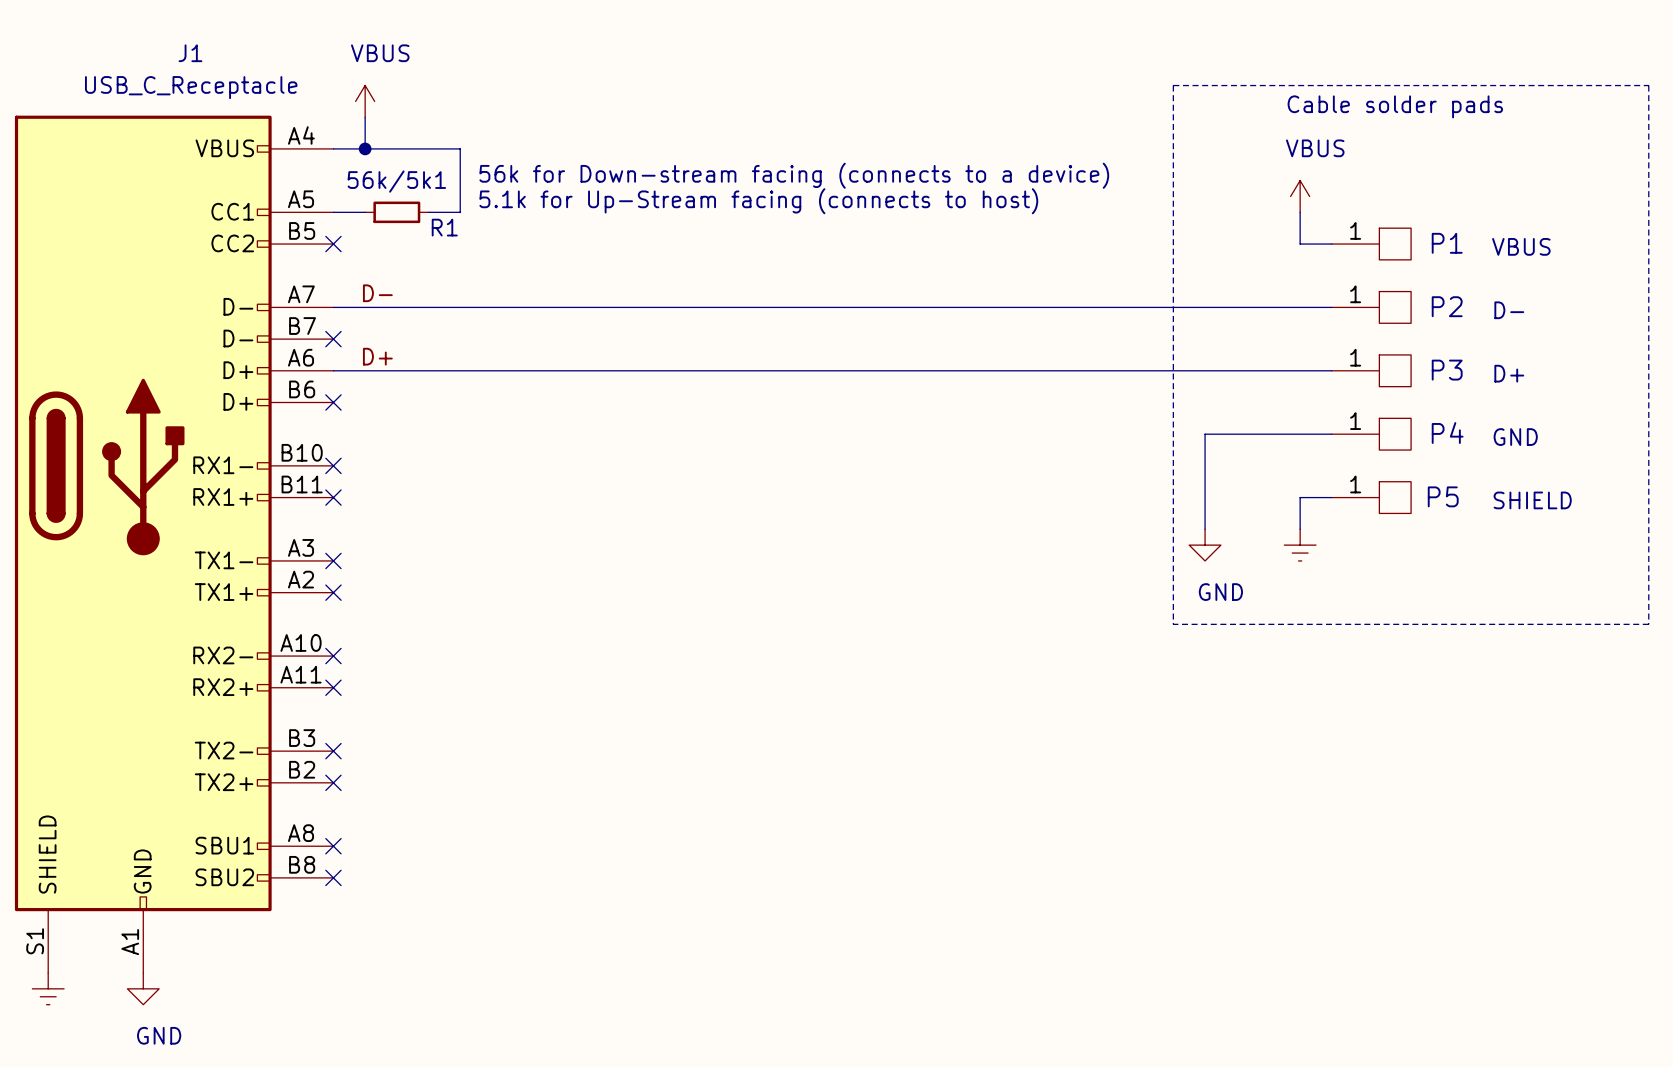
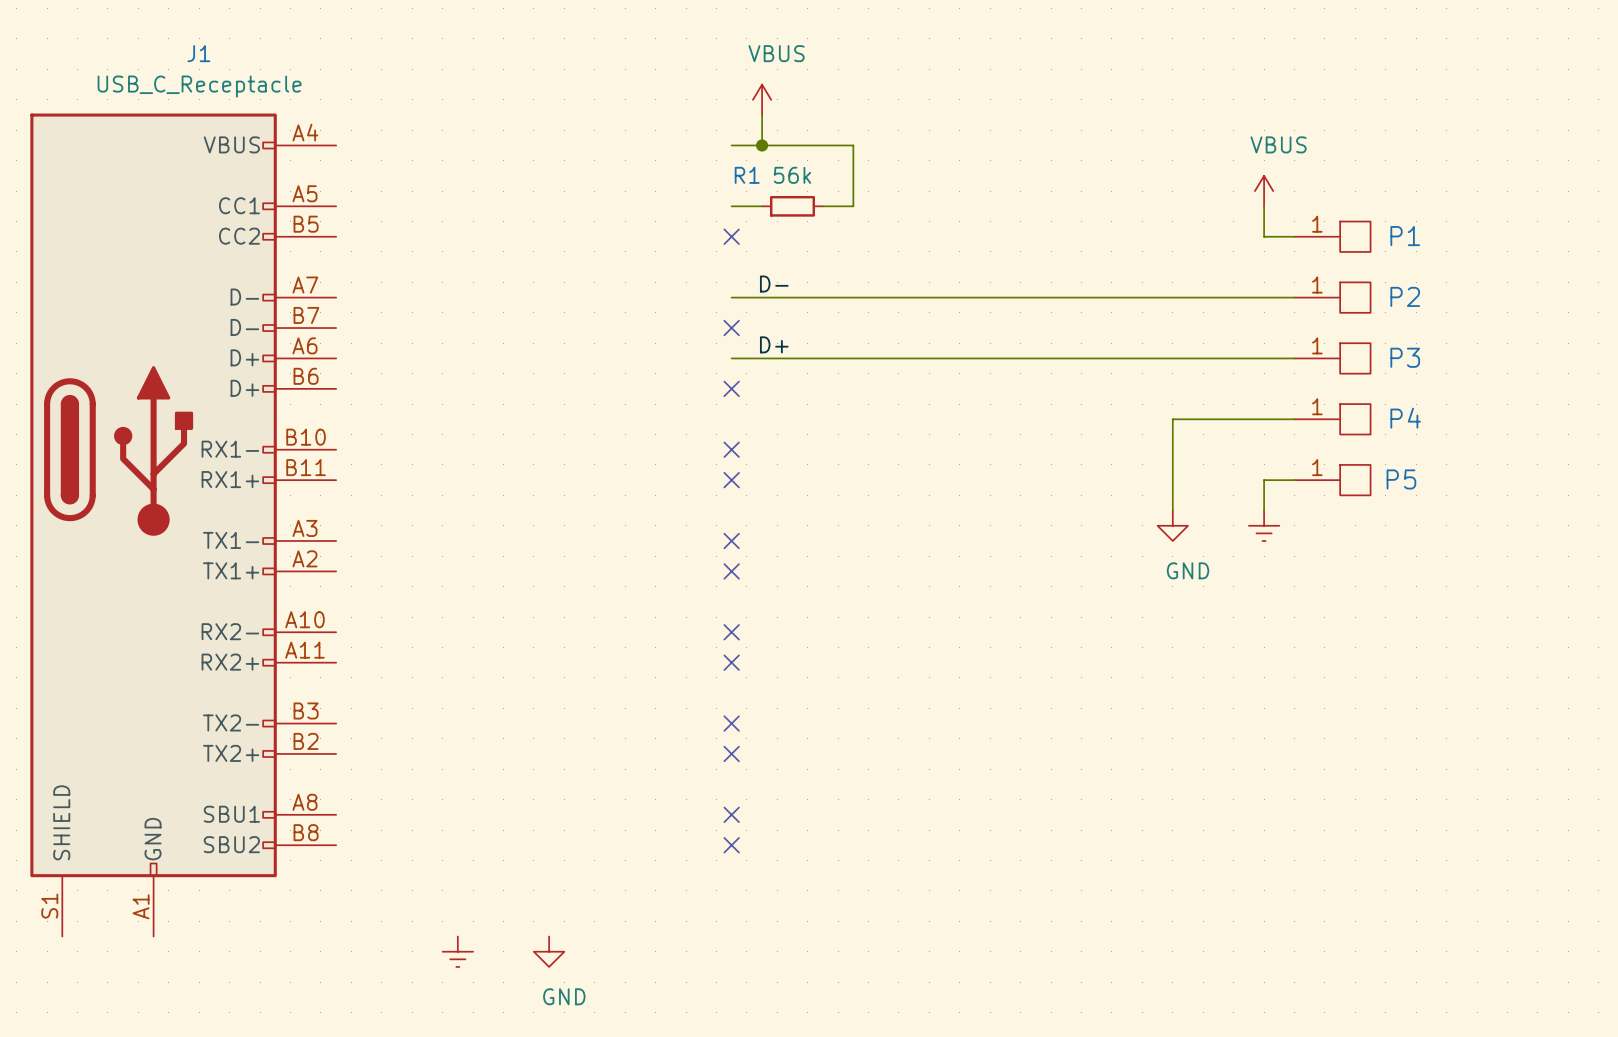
line: (1173, 85) (1173, 624) (1648, 624) (1648, 85) (1173, 85) -> none
power symbol: VBUS (365, 101) -> none
power symbol: none -> VBUS (762, 99)
text: Cable solder pads (1395, 106) -> none
wire: (365, 117) (365, 148) -> none
wire: none -> (762, 115) (762, 145)
wire: (333, 148) (460, 148) (460, 212) (428, 212) -> none
junction: (365, 148) -> none
wire: none -> (731, 145) (853, 145) (853, 206) (822, 206)
junction: none -> (762, 145)
text: 56k for Down-stream facing (connects to a device) (794, 175) -> none
R1 value: 56k/5k1 (396, 181) -> 56k (792, 175)
text: 5.1k for Up-Stream facing (connects to host) (758, 201) -> none
wire: (333, 212) (365, 212) -> none
R1 position: (396, 212) -> (792, 206)
wire: none -> (731, 206) (762, 206)
R1 name position: R1 (444, 227) -> R1 (747, 175)
no-connect mark: (333, 244) -> none
no-connect mark: none -> (731, 236)
text: VBUS (1521, 246) -> none
label: D- (377, 293) -> none
label: none -> D- (774, 284)
wire: (333, 307) (745, 307) -> none
text: D- (1509, 310) -> none
no-connect mark: (333, 339) -> none
no-connect mark: none -> (731, 328)
label: D+ (377, 356) -> none
label: none -> D+ (774, 344)
wire: (333, 370) (745, 370) -> none
text: D+ (1509, 373) -> none
no-connect mark: (333, 402) -> none
no-connect mark: none -> (731, 388)
text: GND (1515, 437) -> none
no-connect mark: (333, 465) -> none
no-connect mark: none -> (731, 449)
no-connect mark: (333, 497) -> none
no-connect mark: none -> (731, 480)
text: SHIELD (1532, 500) -> none
no-connect mark: (333, 560) -> none
no-connect mark: none -> (731, 540)
no-connect mark: (333, 592) -> none
no-connect mark: none -> (731, 571)
no-connect mark: (333, 656) -> none
no-connect mark: none -> (731, 632)
no-connect mark: (333, 687) -> none
no-connect mark: none -> (731, 662)
no-connect mark: (333, 751) -> none
no-connect mark: none -> (731, 723)
no-connect mark: (333, 782) -> none
no-connect mark: none -> (731, 753)
no-connect mark: (333, 846) -> none
no-connect mark: none -> (731, 814)
no-connect mark: (333, 877) -> none
no-connect mark: none -> (731, 845)
power symbol: (48, 988) -> none
power symbol: GND (143, 988) -> none
power symbol: none -> (457, 951)
power symbol: none -> GND (549, 951)

